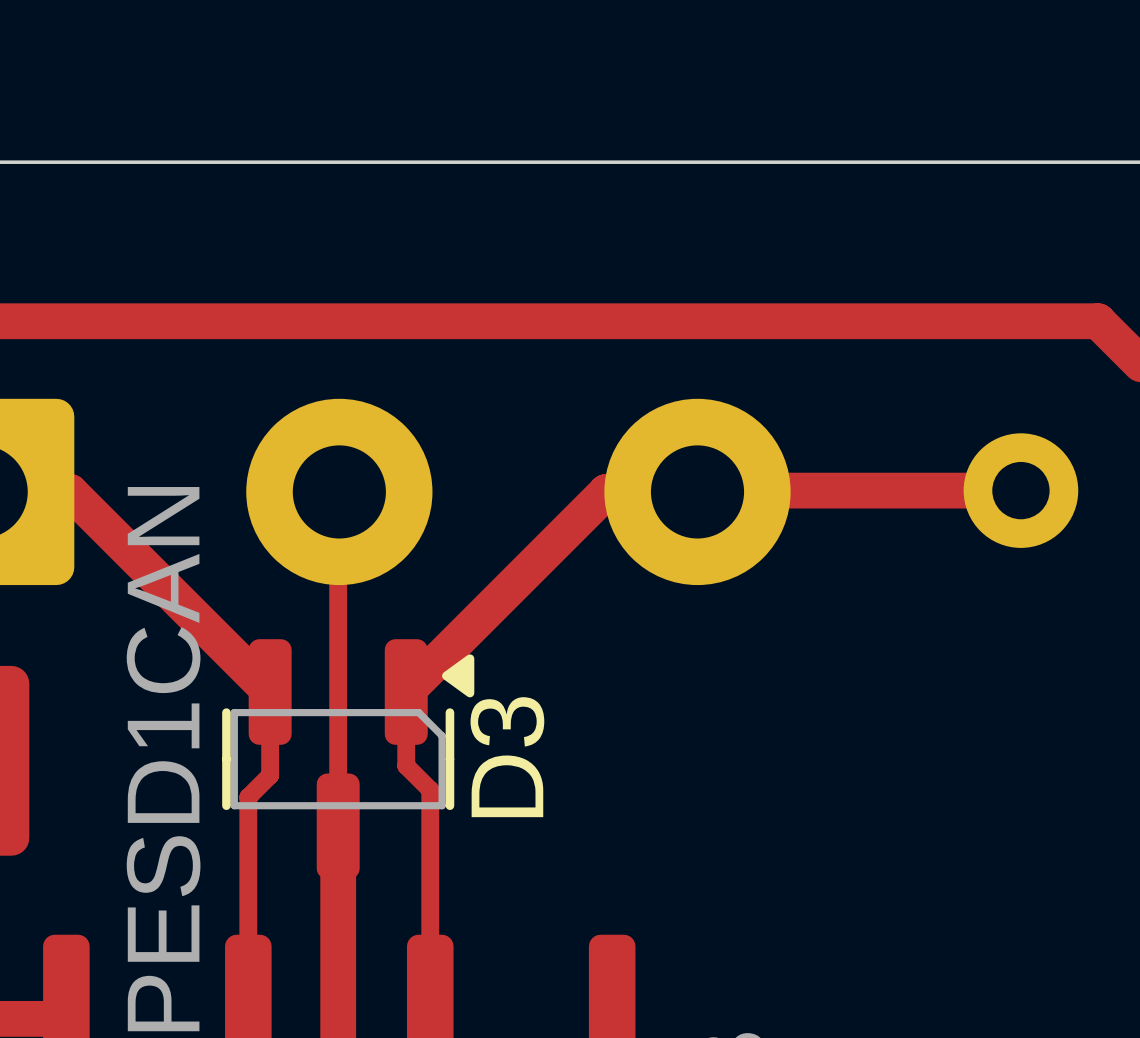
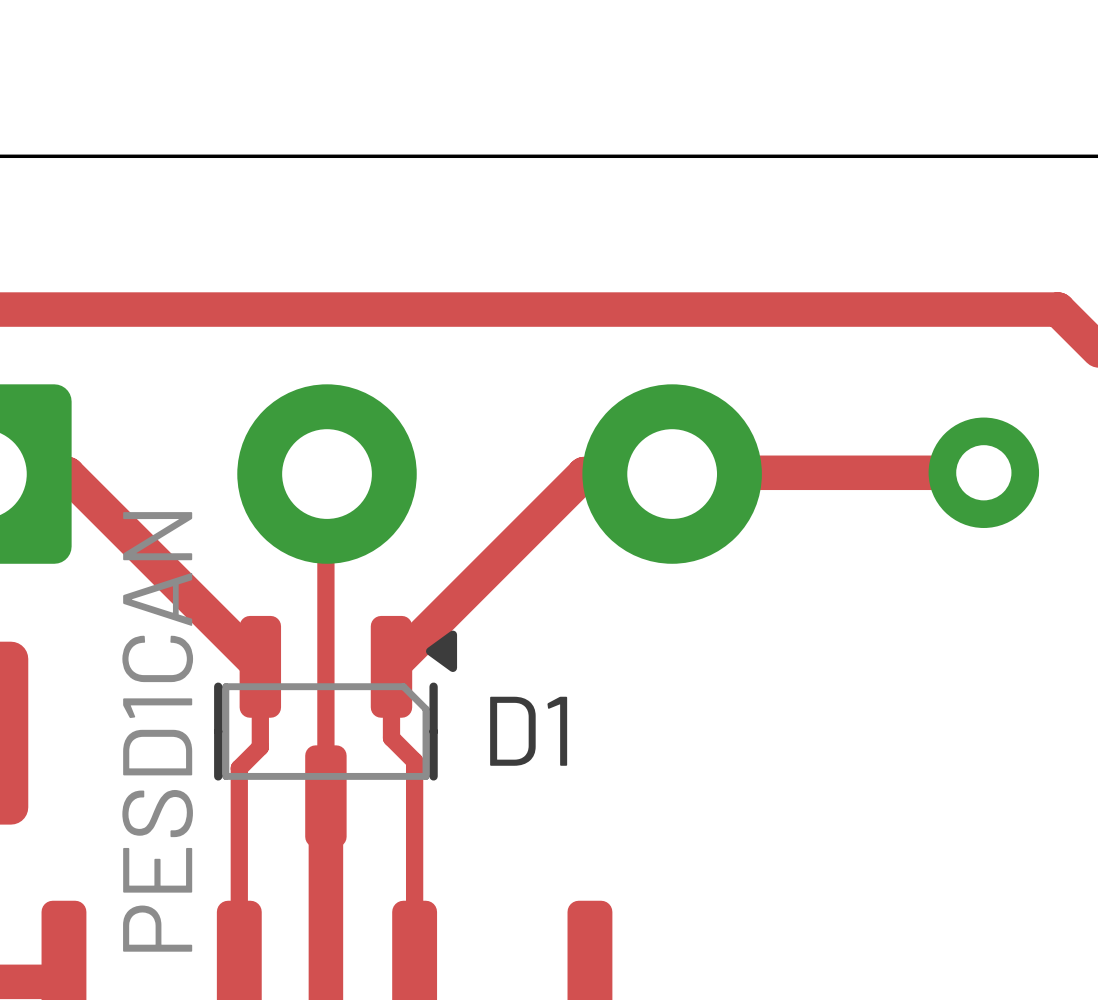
D3 name: D3 (507, 757) -> D1 (528, 731)

